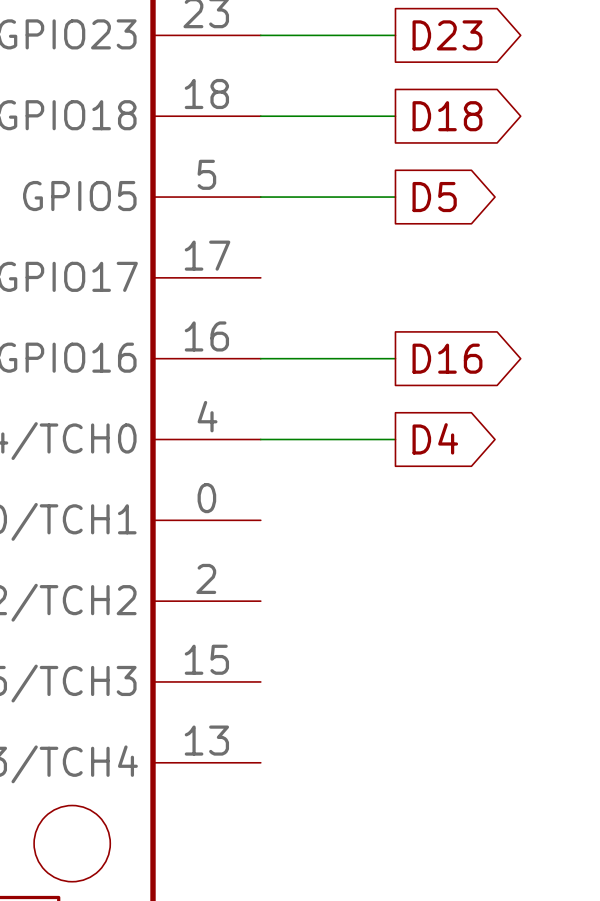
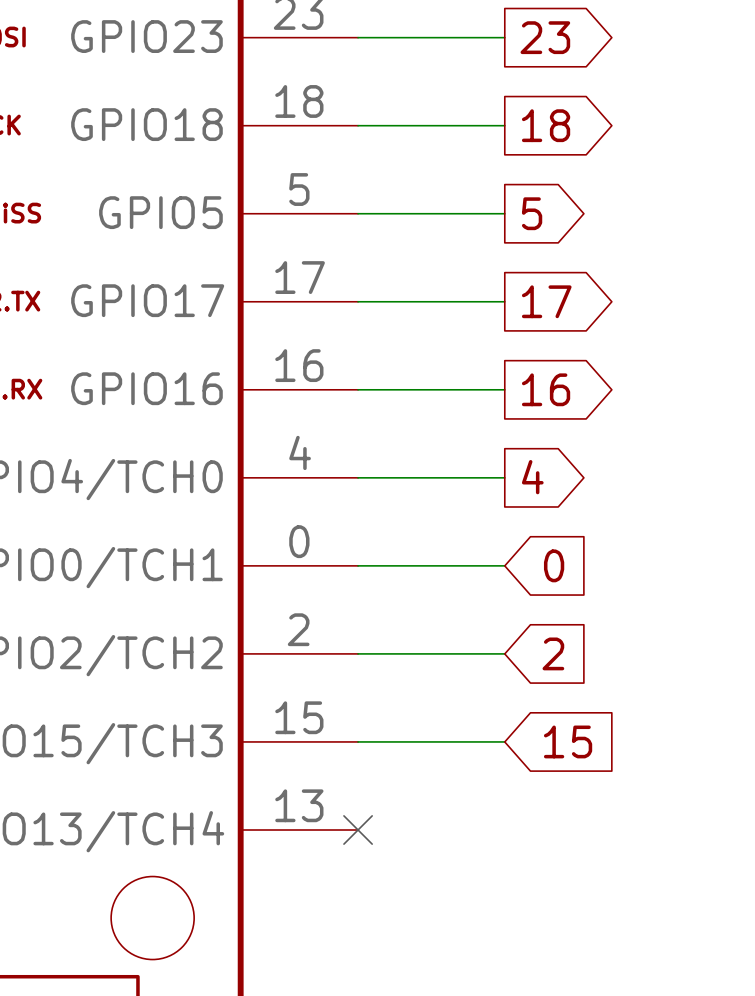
global label: D23 (447, 35) -> 23 (545, 37)
global label: D18 (447, 116) -> 18 (546, 125)
global label: D5 (434, 197) -> 5 (532, 213)
wire: none -> (358, 301) (504, 301)
global label: none -> 17 (546, 301)
global label: D16 (447, 358) -> 16 (546, 389)
global label: D4 (435, 438) -> 4 (532, 477)
wire: none -> (358, 565) (504, 565)
global label: none -> 0 (554, 565)
wire: none -> (358, 653) (504, 653)
global label: none -> 2 (553, 653)
wire: none -> (358, 741) (504, 741)
global label: none -> 15 (568, 741)
no-connect mark: none -> (358, 830)

